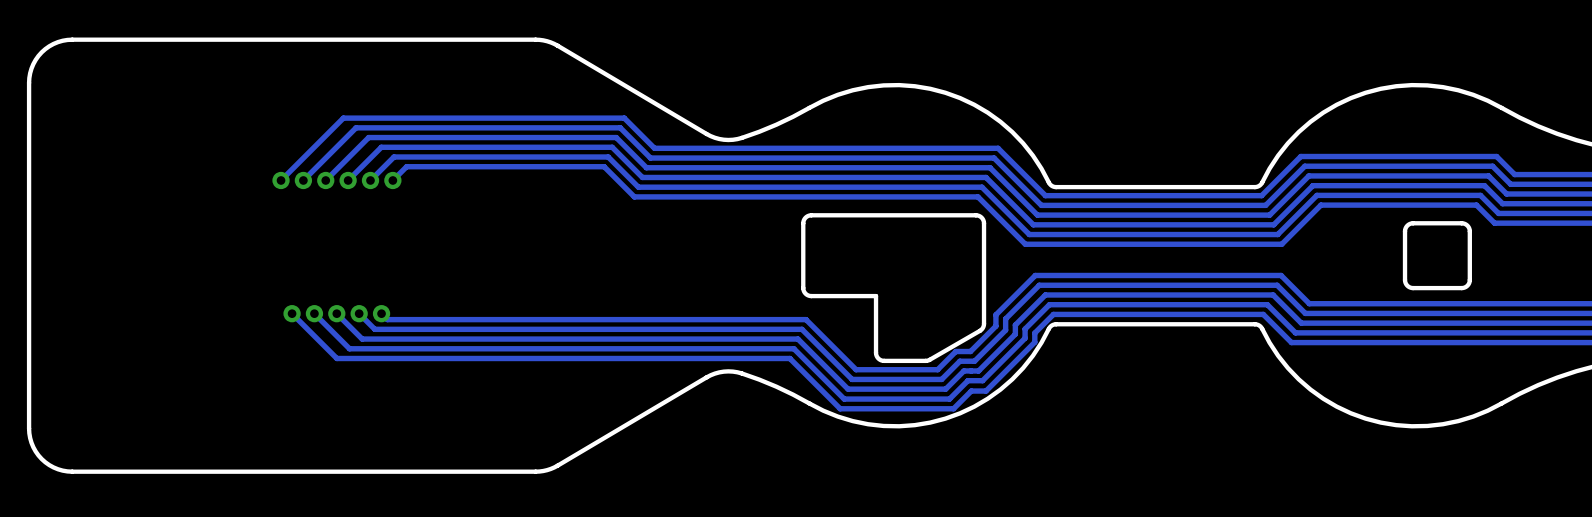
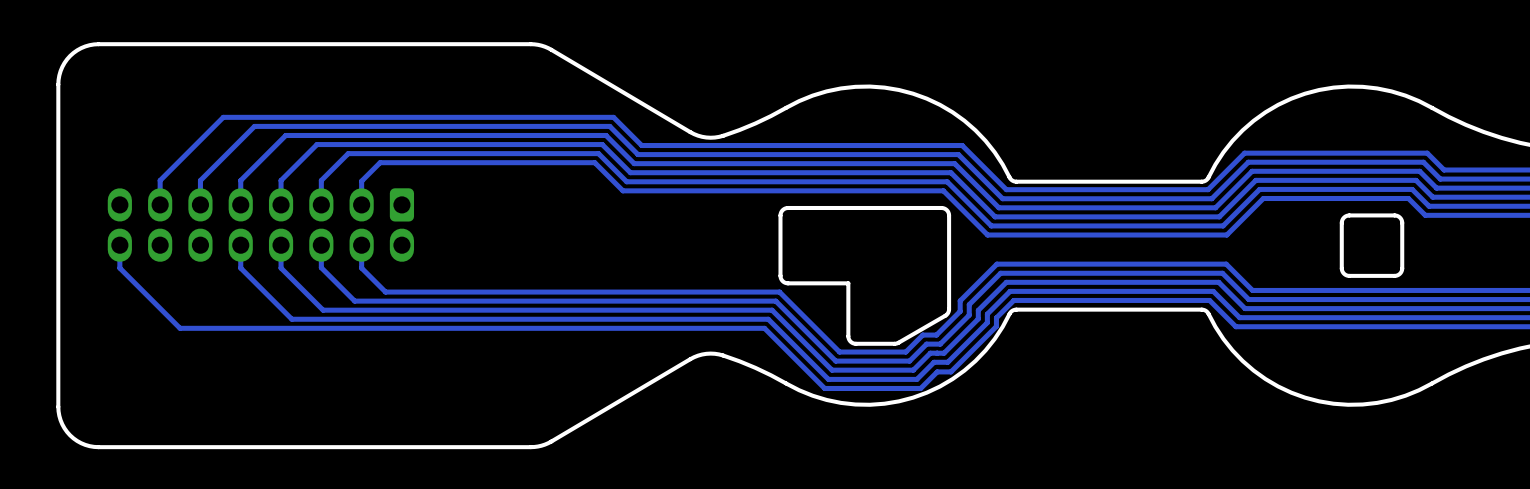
track: (343, 118) (281, 180) -> (351, 117) (223, 117) (160, 180) (160, 204)
track: (356, 127) (303, 180) -> (363, 126) (254, 126) (200, 180) (200, 204)
track: (368, 137) (325, 180) -> (375, 135) (285, 135) (240, 180) (240, 204)
track: (381, 147) (348, 180) -> (386, 144) (317, 144) (281, 180) (281, 204)
track: (393, 157) (370, 180) -> (398, 153) (348, 153) (321, 180) (321, 204)
track: (406, 166) (392, 180) -> (410, 162) (380, 162) (361, 181) (361, 204)
via: (281, 180) -> none
via: (303, 180) -> none
via: (325, 180) -> none
via: (348, 180) -> none
via: (370, 180) -> none
via: (392, 180) -> none
part: none -> (260, 225)
track: (292, 313) (336, 358) (789, 358) (840, 408) (850, 408) -> (119, 245) (119, 268) (180, 328) (764, 328) (824, 388)
via: (292, 313) -> none
track: (314, 313) (349, 348) (793, 348) (844, 399) (854, 399) -> (240, 245) (240, 268) (291, 319) (768, 319) (828, 379)
via: (314, 313) -> none
track: (336, 313) (362, 339) (797, 339) (848, 389) (858, 389) -> (281, 245) (281, 268) (323, 310) (772, 310) (832, 370)
via: (336, 313) -> none
track: (359, 313) (374, 329) (801, 329) (852, 379) (862, 379) -> (321, 245) (321, 267) (354, 301) (775, 301) (835, 361)
via: (359, 313) -> none
track: (381, 313) (387, 319) (806, 319) (856, 369) (866, 369) -> (361, 245) (361, 268) (385, 292) (779, 292) (839, 352)
via: (381, 313) -> none

